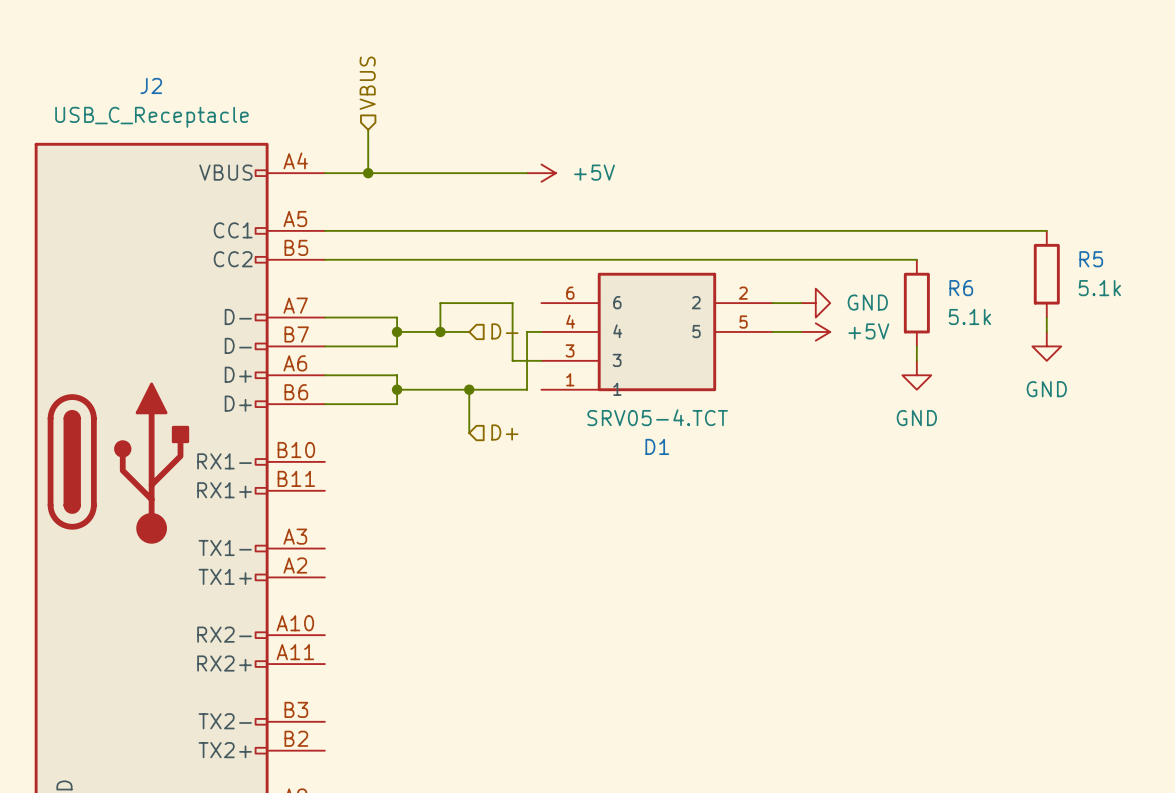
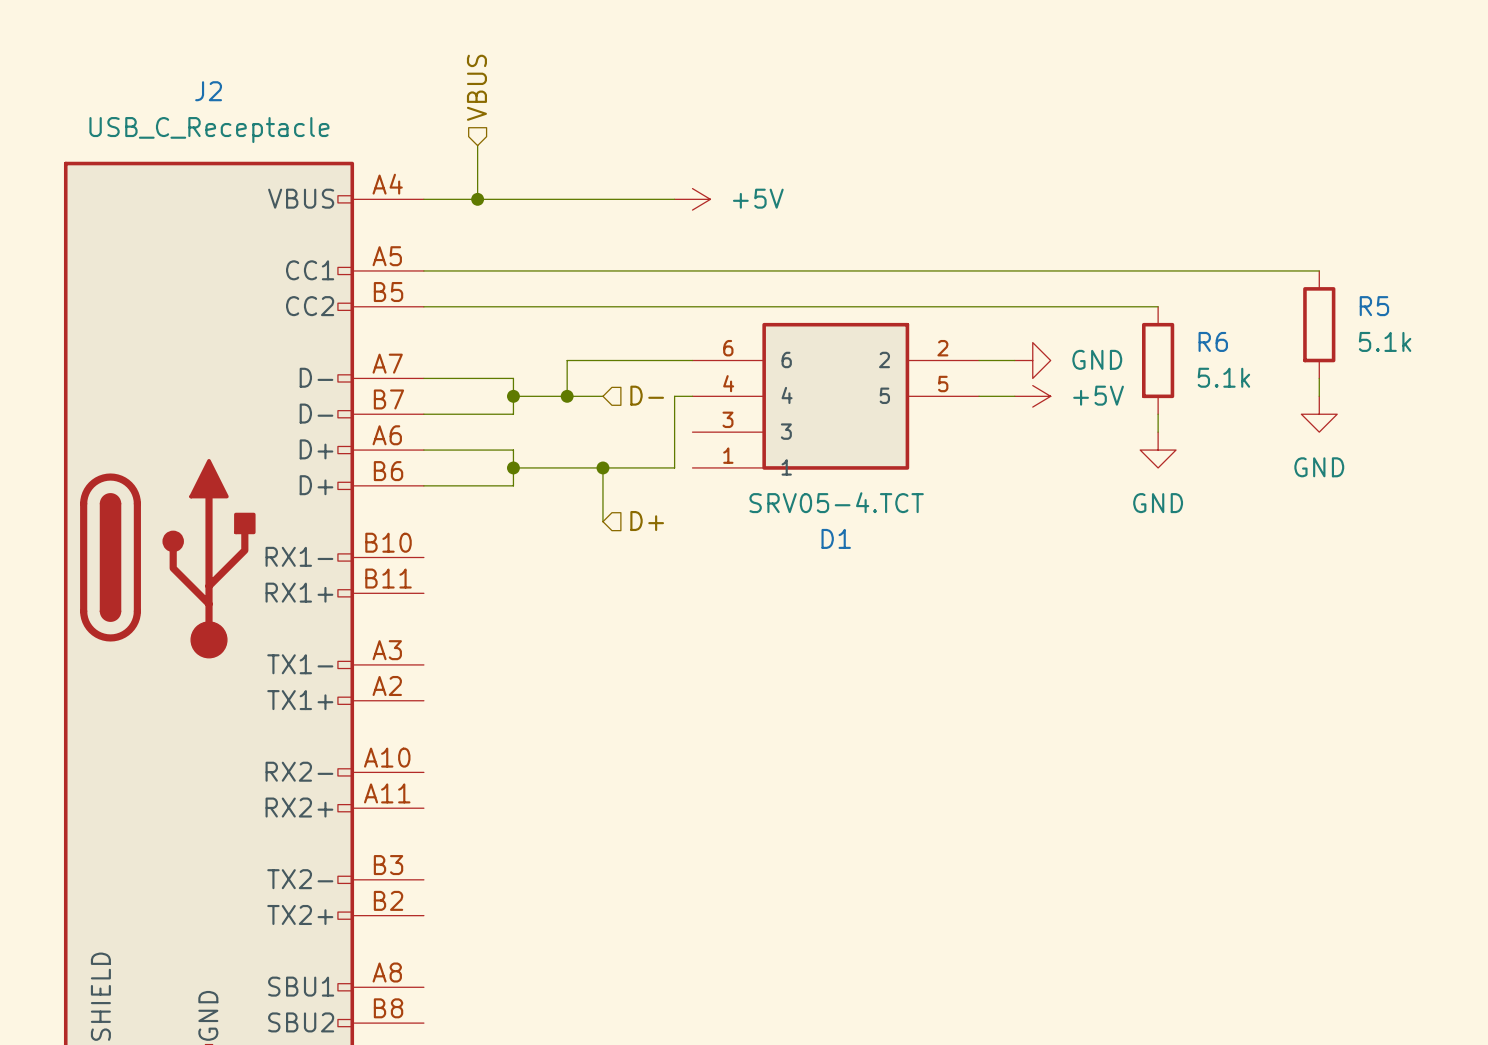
wire: (512, 303) (512, 360) (541, 360) -> (656, 360) (692, 360)

